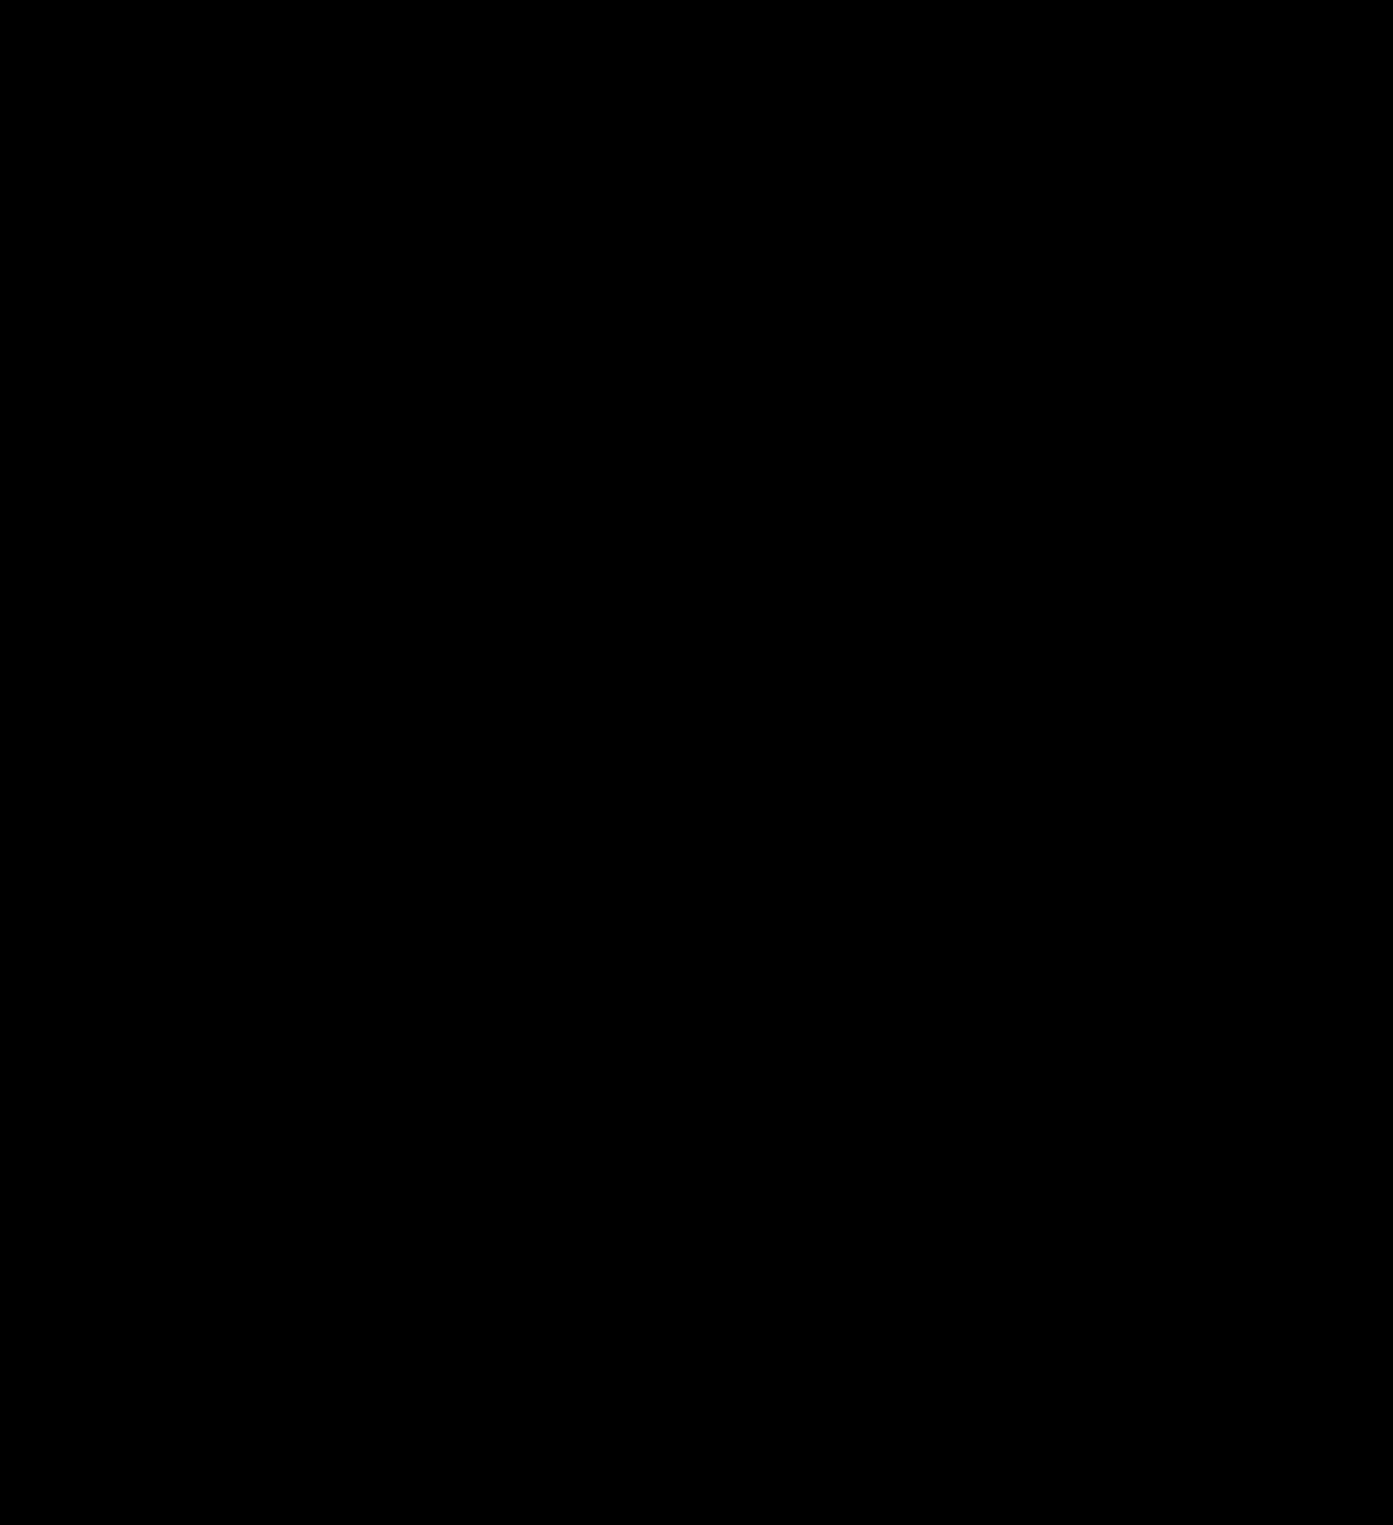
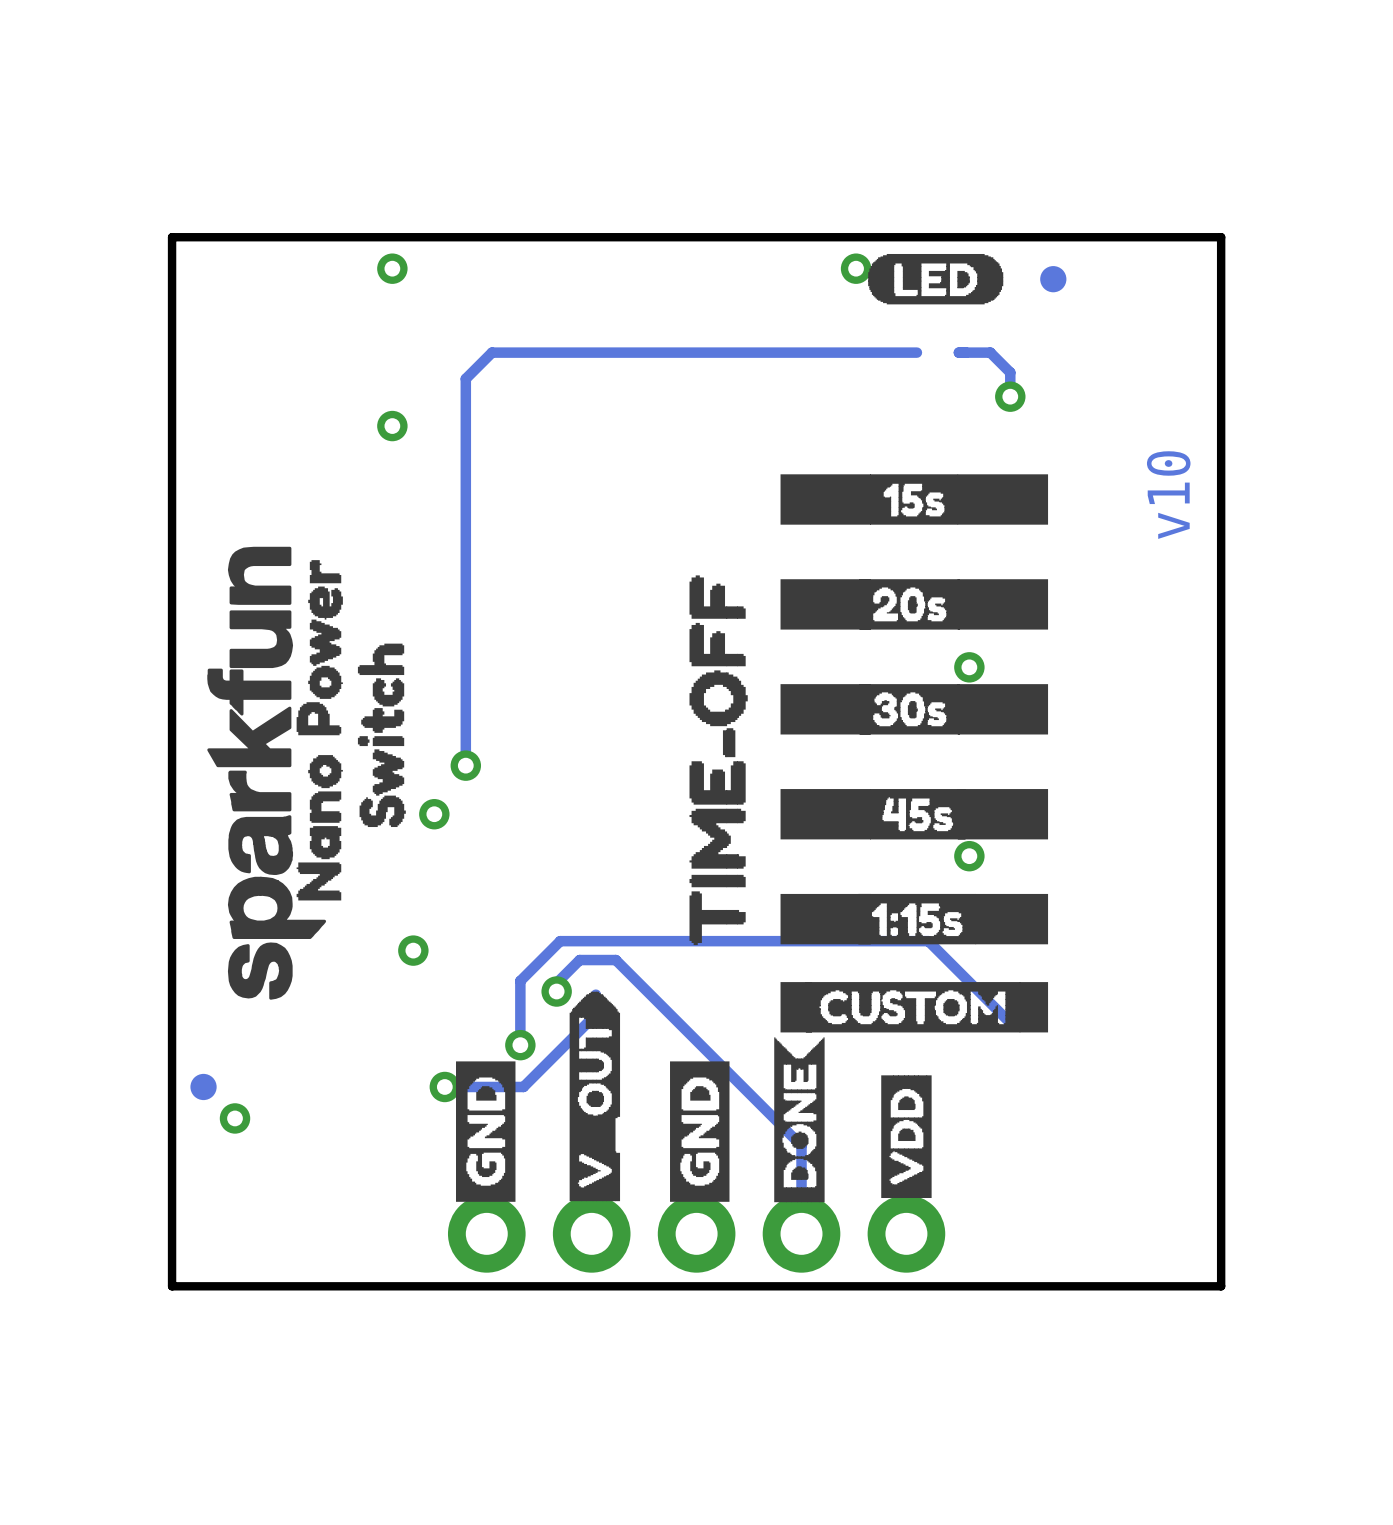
board edge: none -> (1221, 237) (1221, 1286) (172, 1286) (172, 237) (1221, 237)
drawing: none -> [868, 253, 1004, 305]
via: none -> (392, 268)
via: none -> (856, 268)
part: none -> (1053, 279)
track: none -> (916, 352) (492, 352) (465, 378) (465, 765)
track: none -> (958, 352) (990, 352) (1010, 372) (1010, 396)
via: none -> (1010, 396)
via: none -> (392, 426)
drawing: none -> [780, 474, 1049, 525]
text: none -> v10 (1168, 495)
drawing: none -> [207, 546, 406, 1000]
drawing: none -> [670, 575, 1049, 1203]
via: none -> (969, 667)
via: none -> (465, 765)
via: none -> (434, 814)
via: none -> (969, 856)
via: none -> (413, 950)
track: none -> (556, 991) (556, 983) (579, 960) (615, 960) (801, 1145) (801, 1233)
via: none -> (556, 991)
drawing: none -> [569, 991, 621, 1202]
track: none -> (595, 994) (595, 1014) (523, 1086) (444, 1086)
track: none -> (1011, 1024) (928, 941) (560, 941) (520, 981) (520, 1045)
via: none -> (520, 1045)
drawing: none -> [456, 1061, 516, 1202]
part: none -> (203, 1086)
via: none -> (444, 1086)
via: none -> (235, 1118)
part: none -> (696, 1233)

